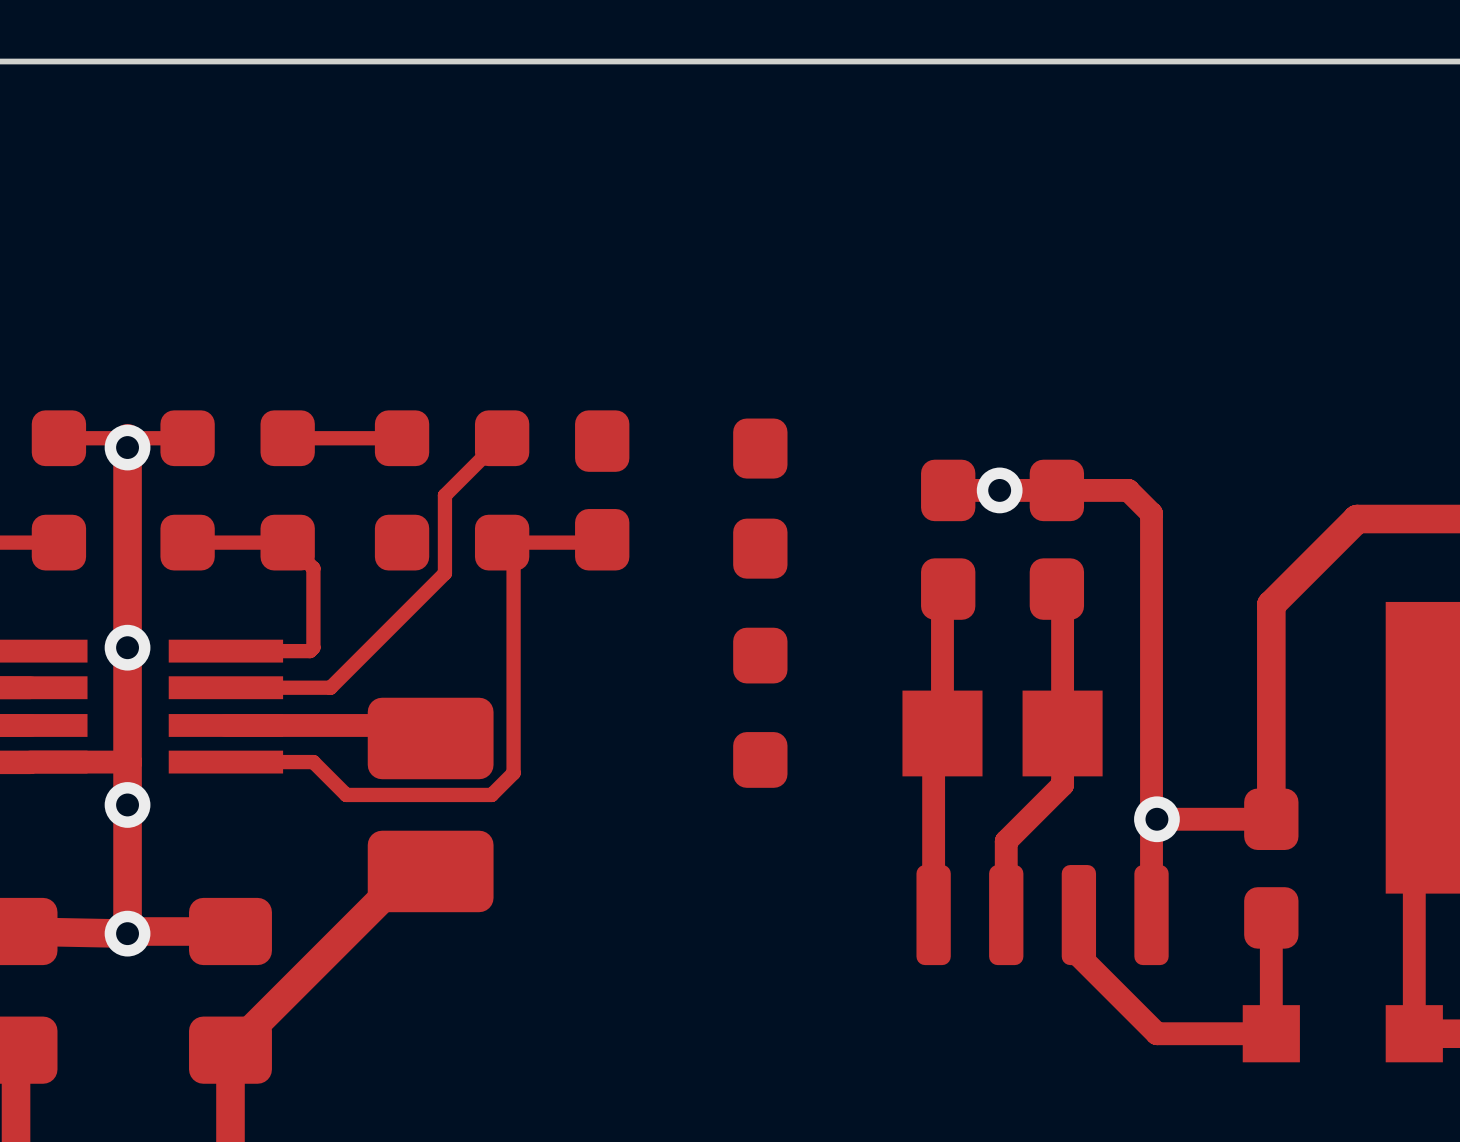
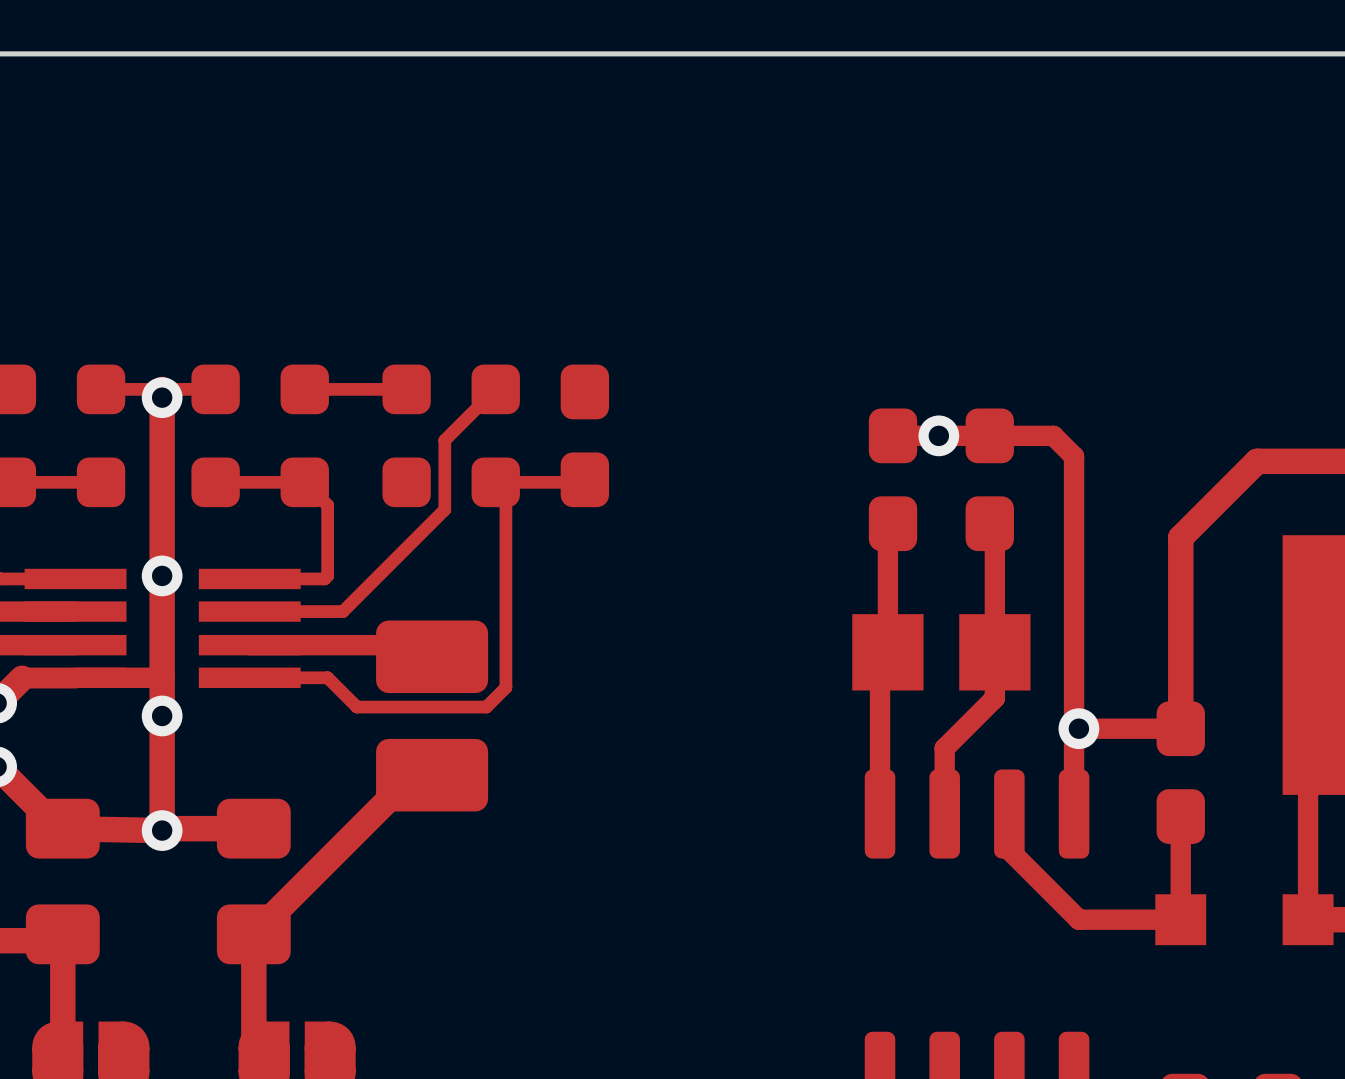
part: (760, 498) -> none
part: (760, 707) -> none

